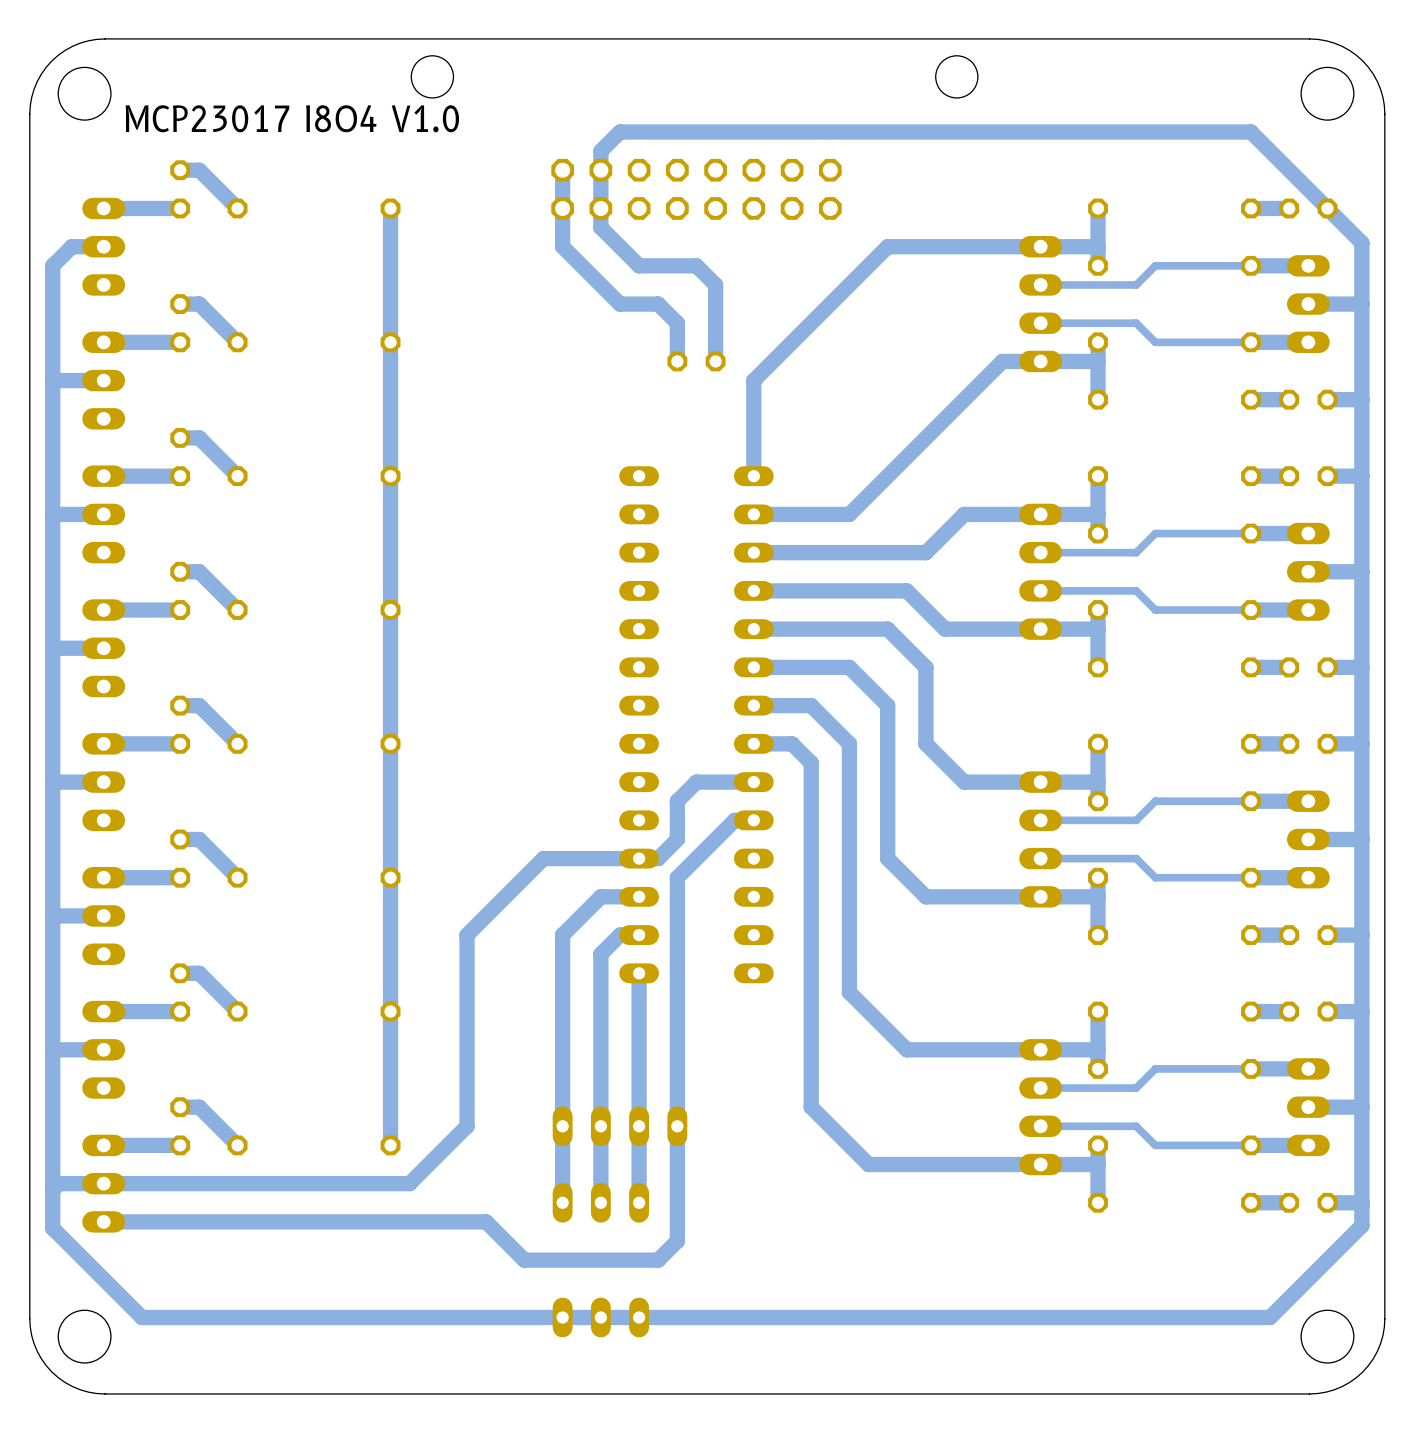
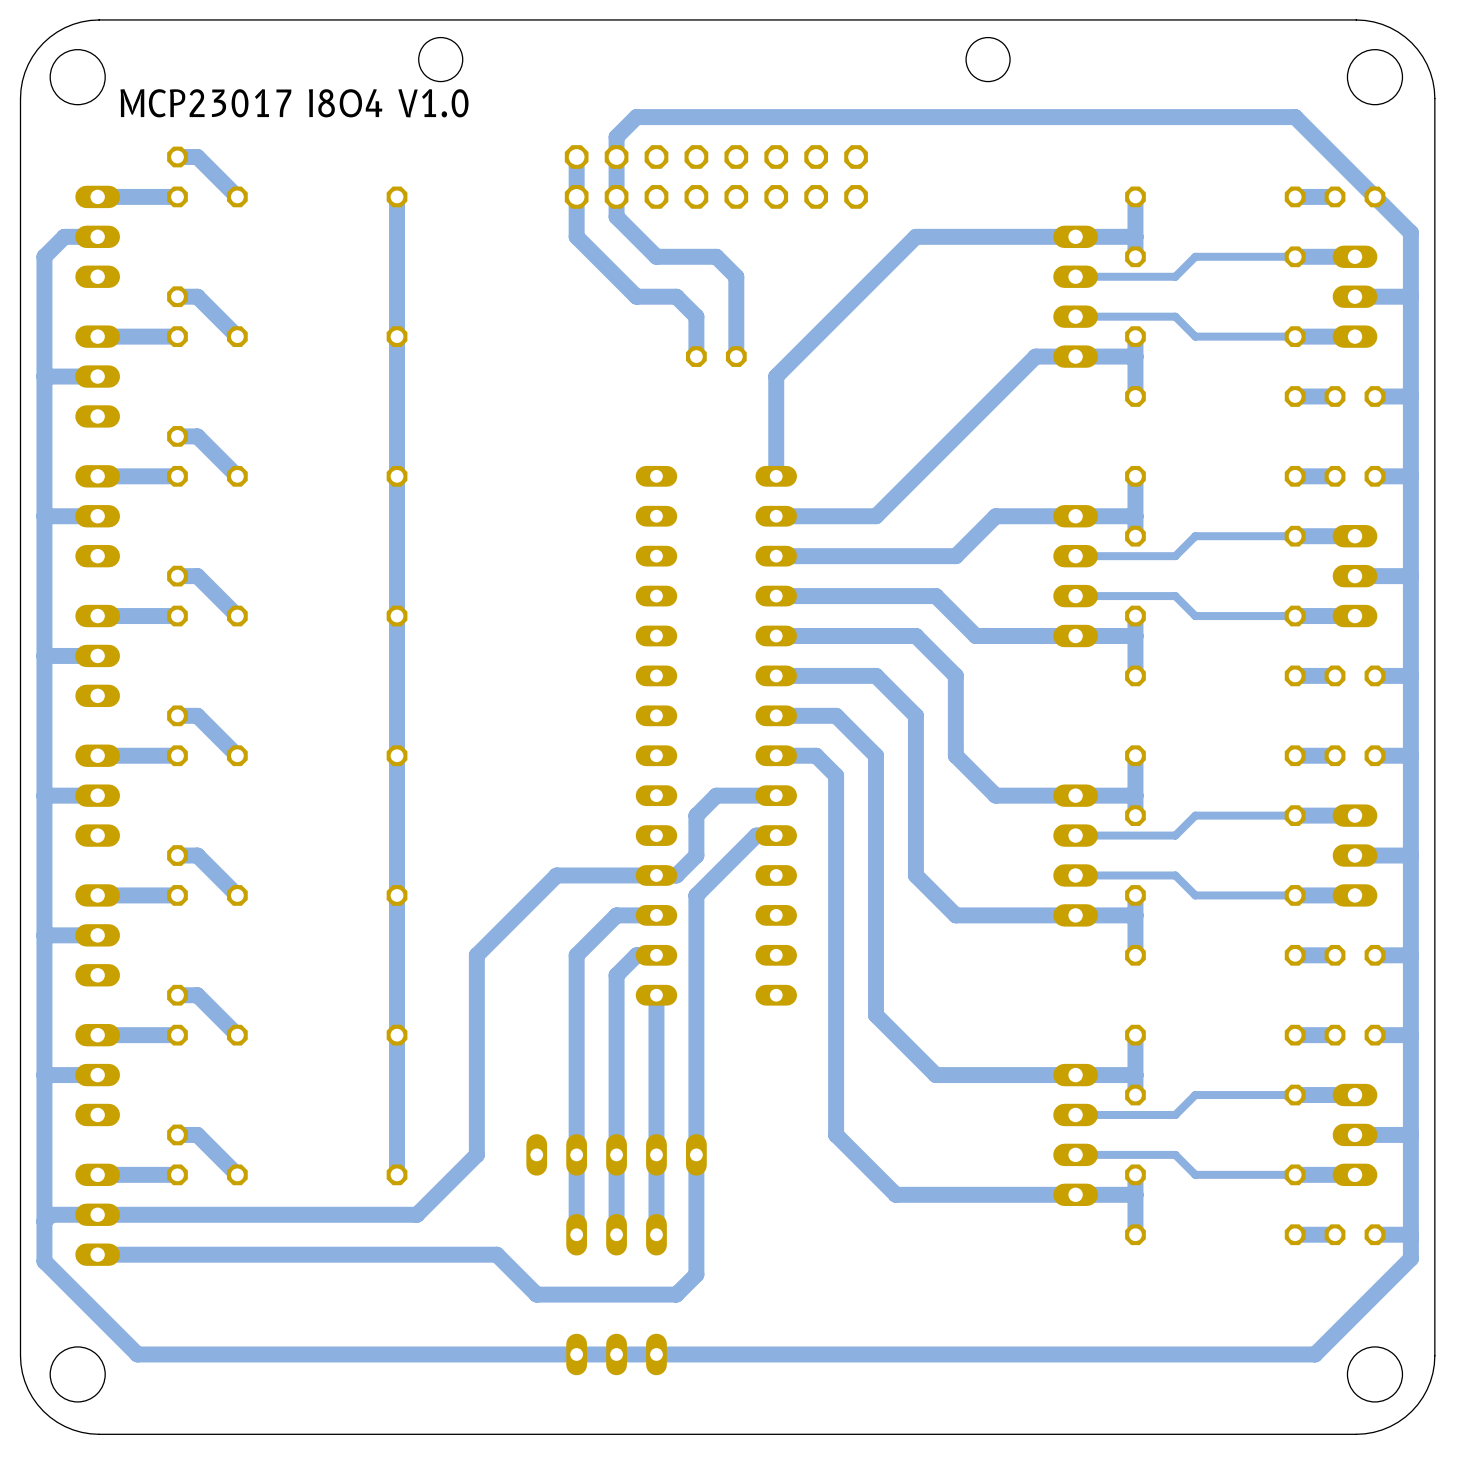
part: none -> (616, 1154)

